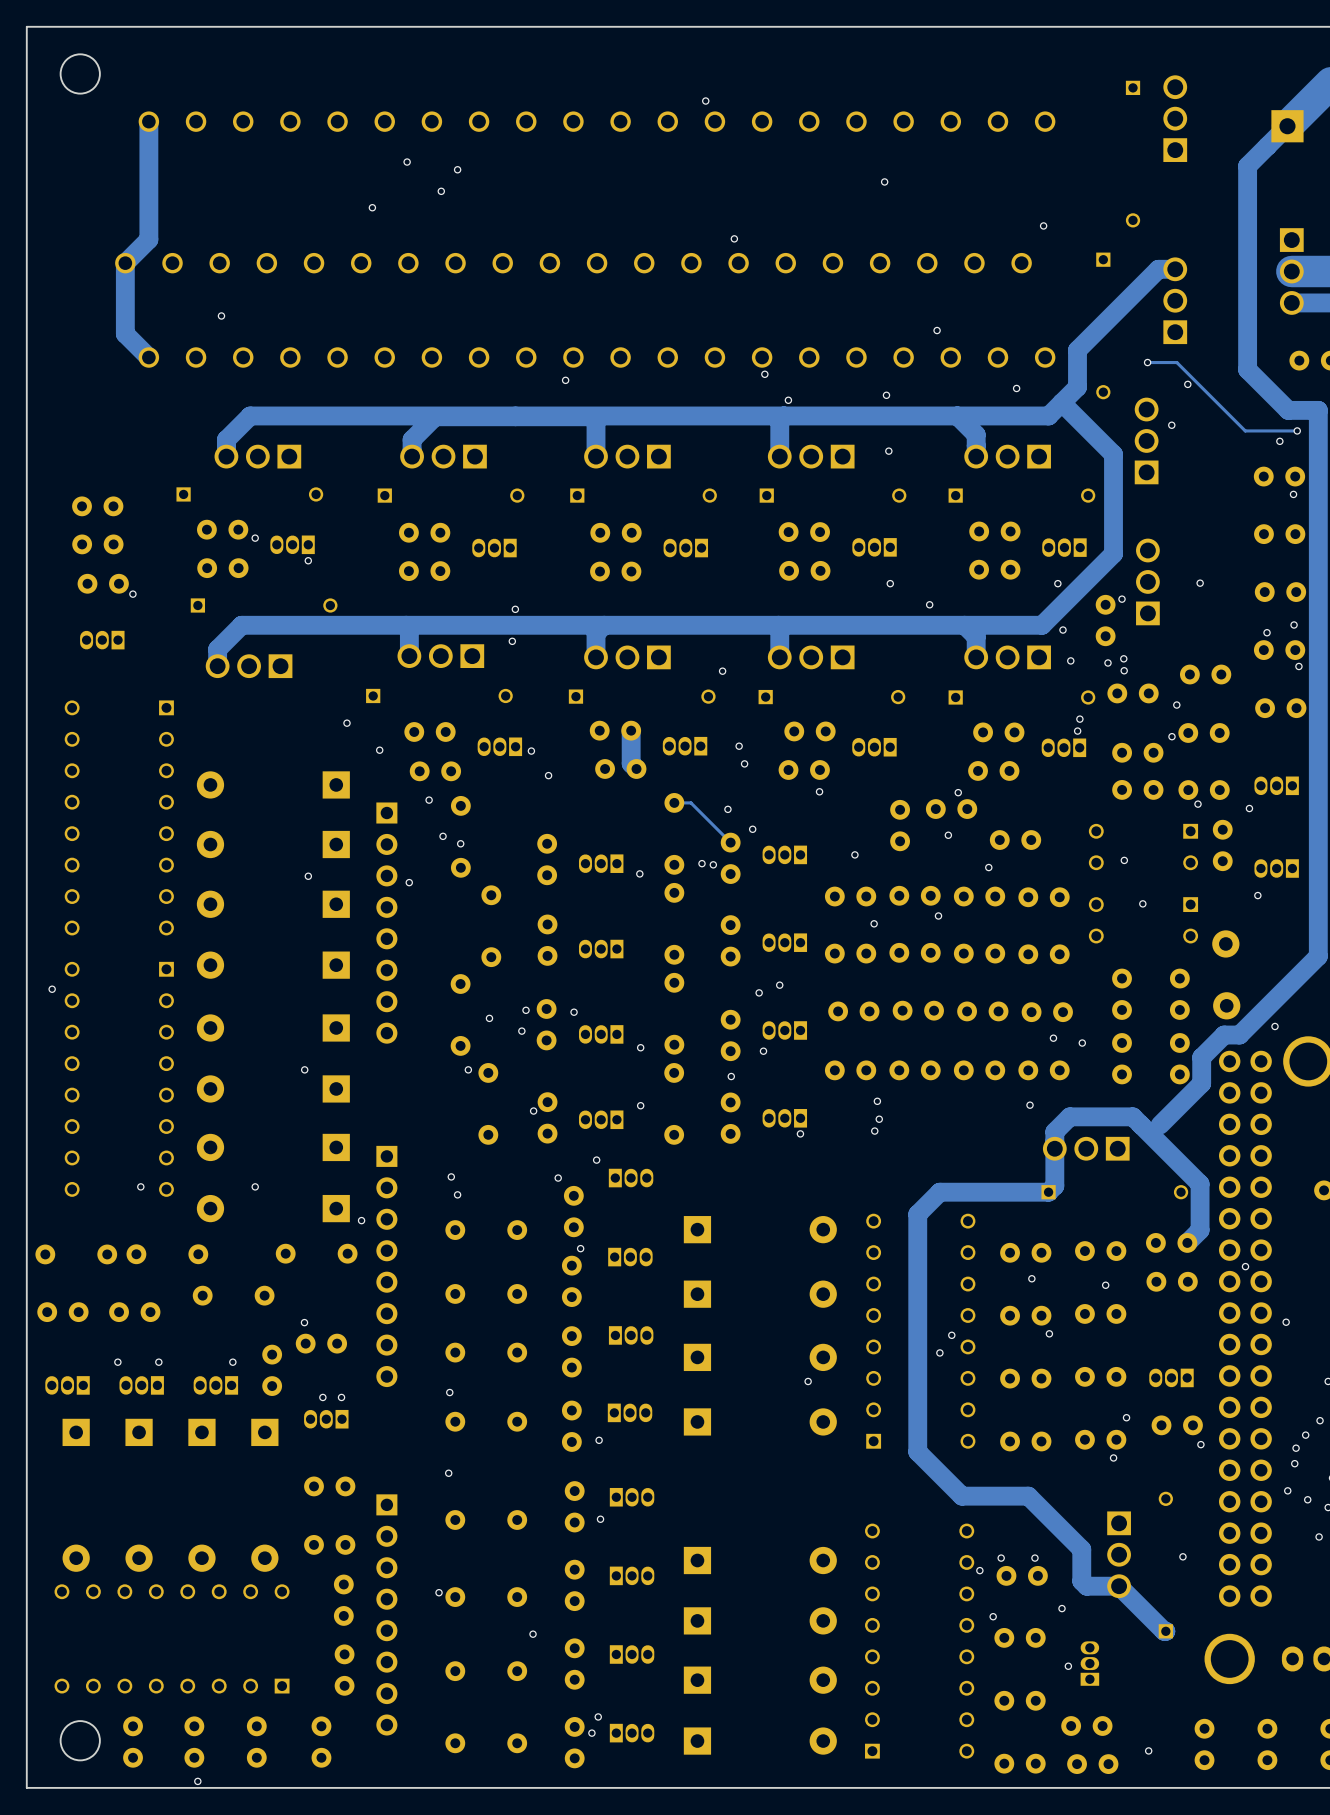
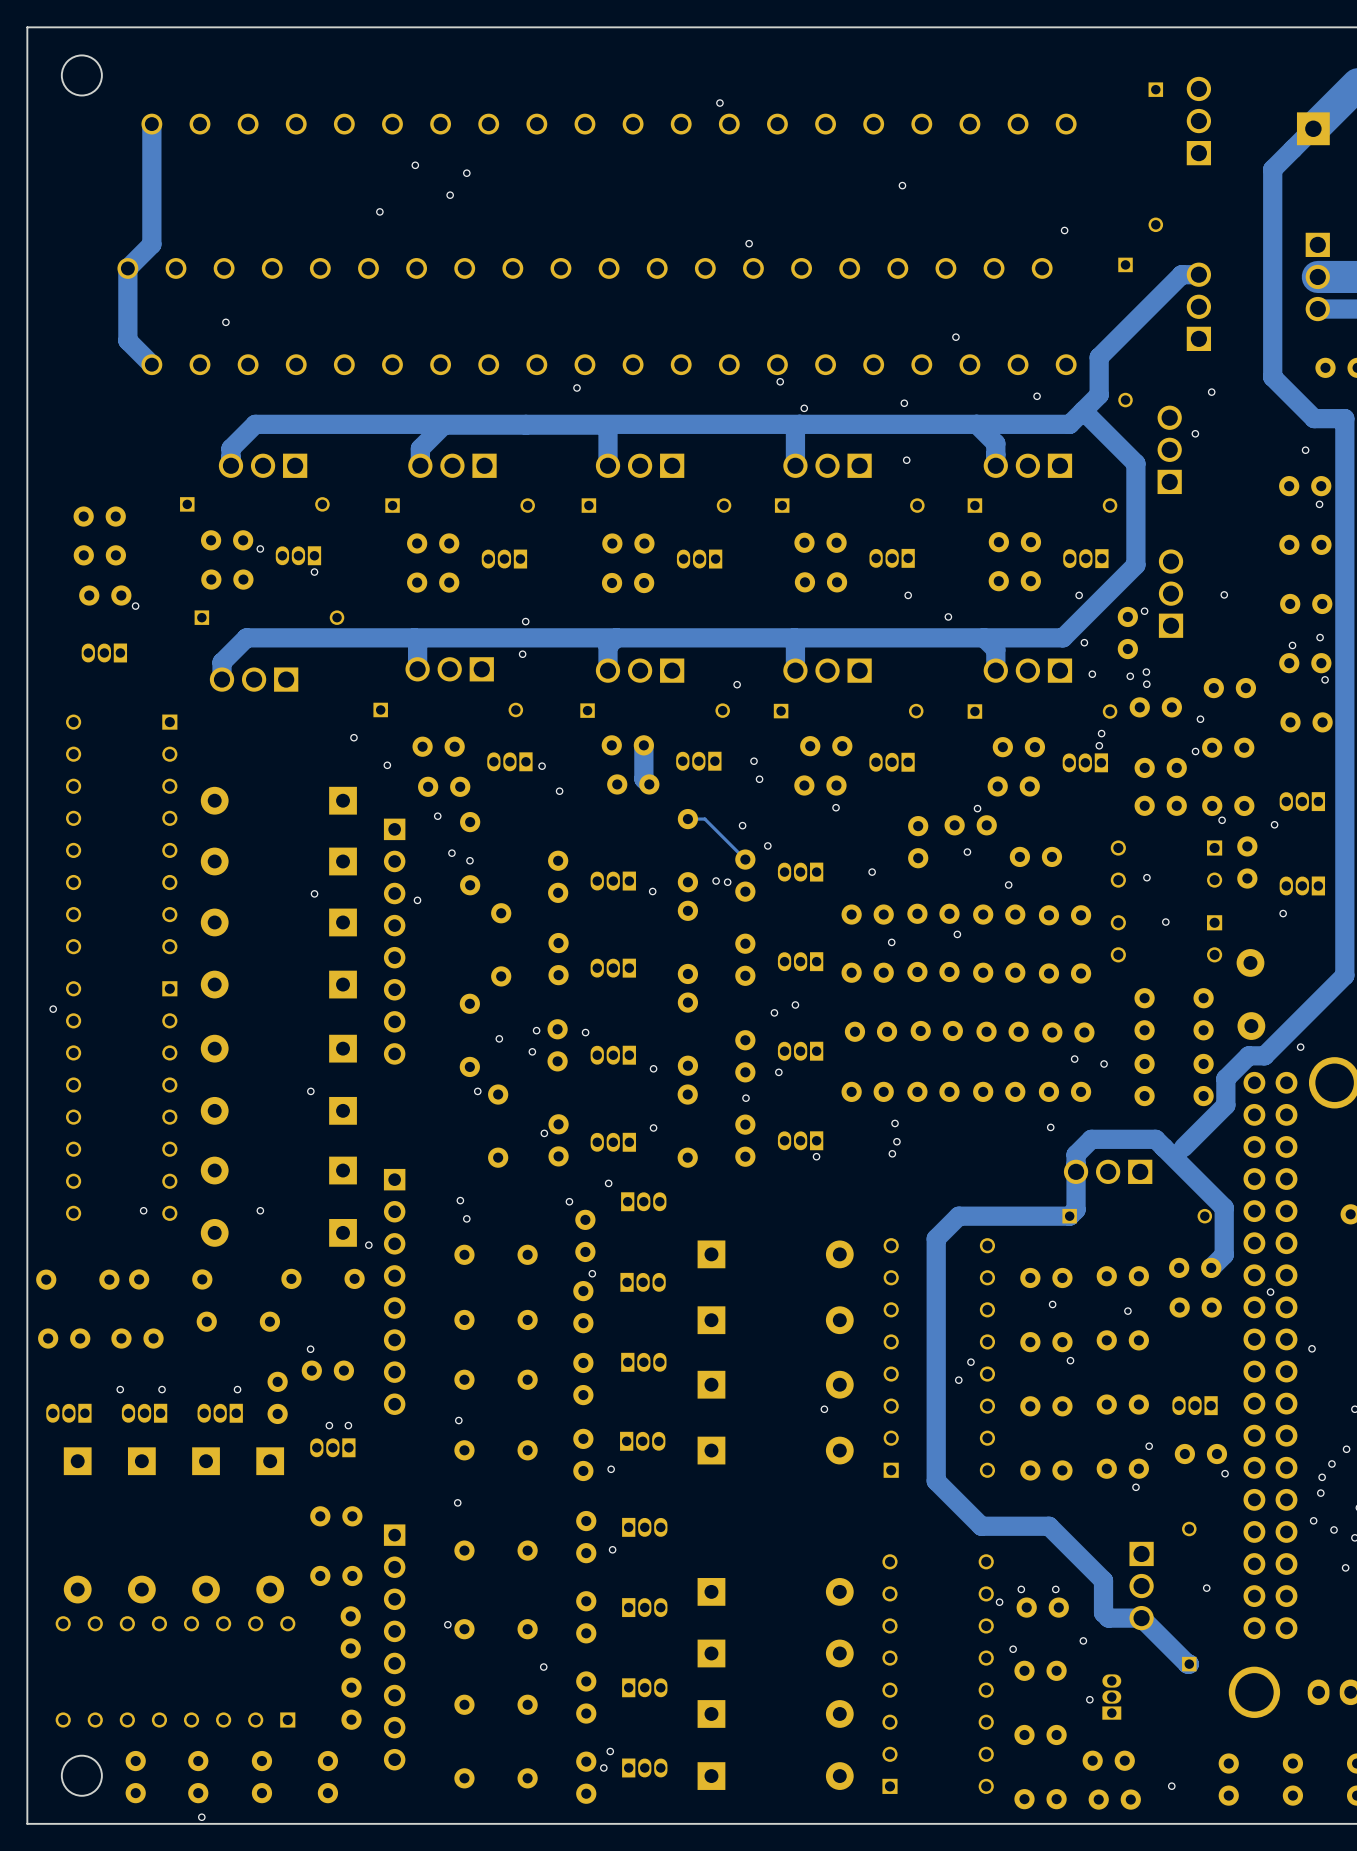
track: (1147, 362) (1176, 362) (1245, 430) (1297, 430) -> none
via: (1147, 362) -> none
via: (1297, 430) -> none

